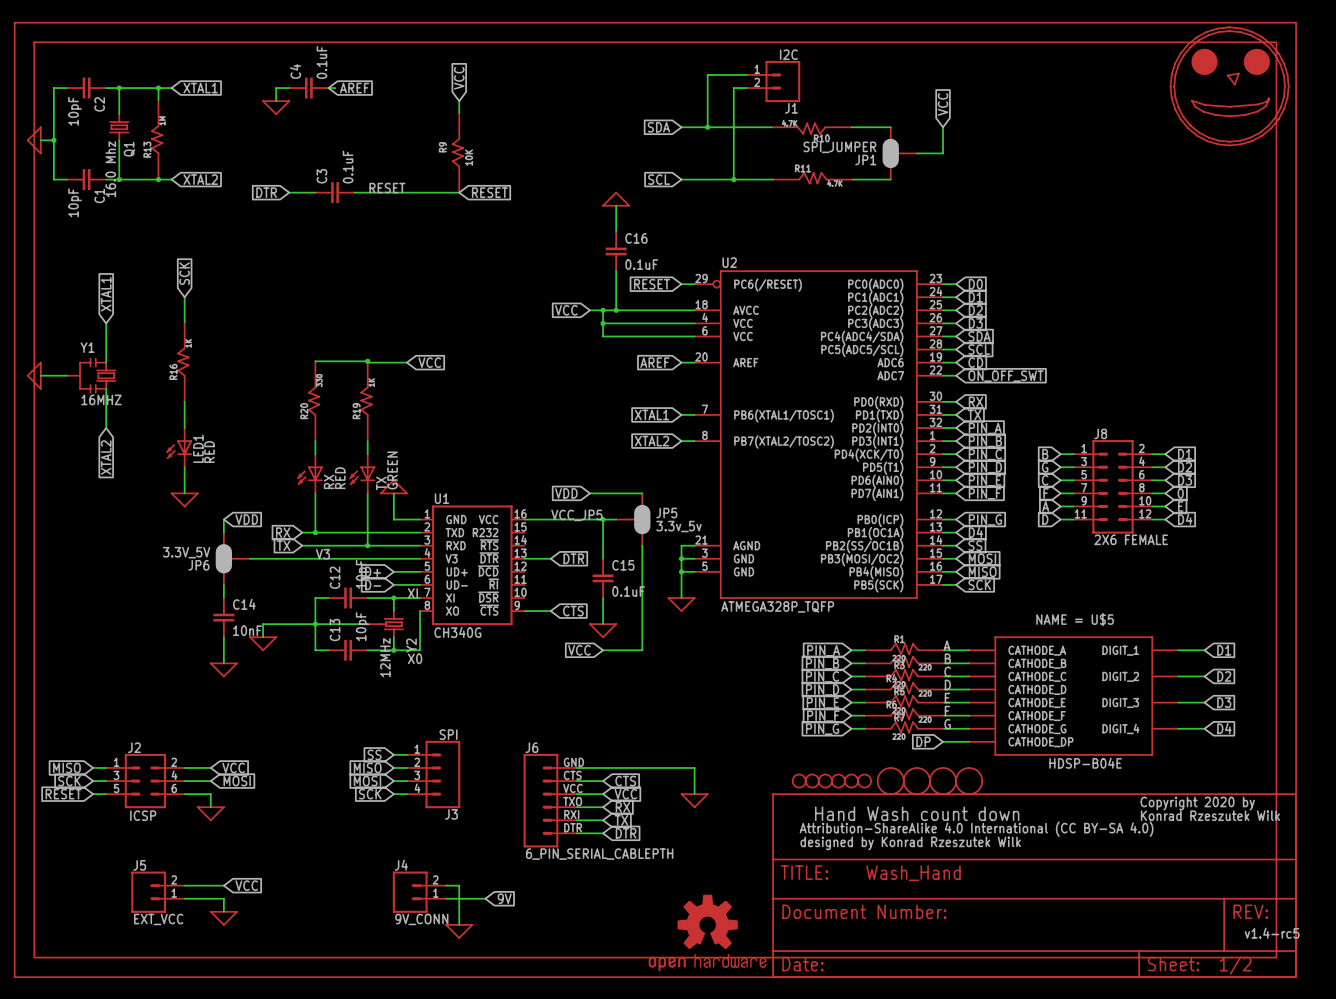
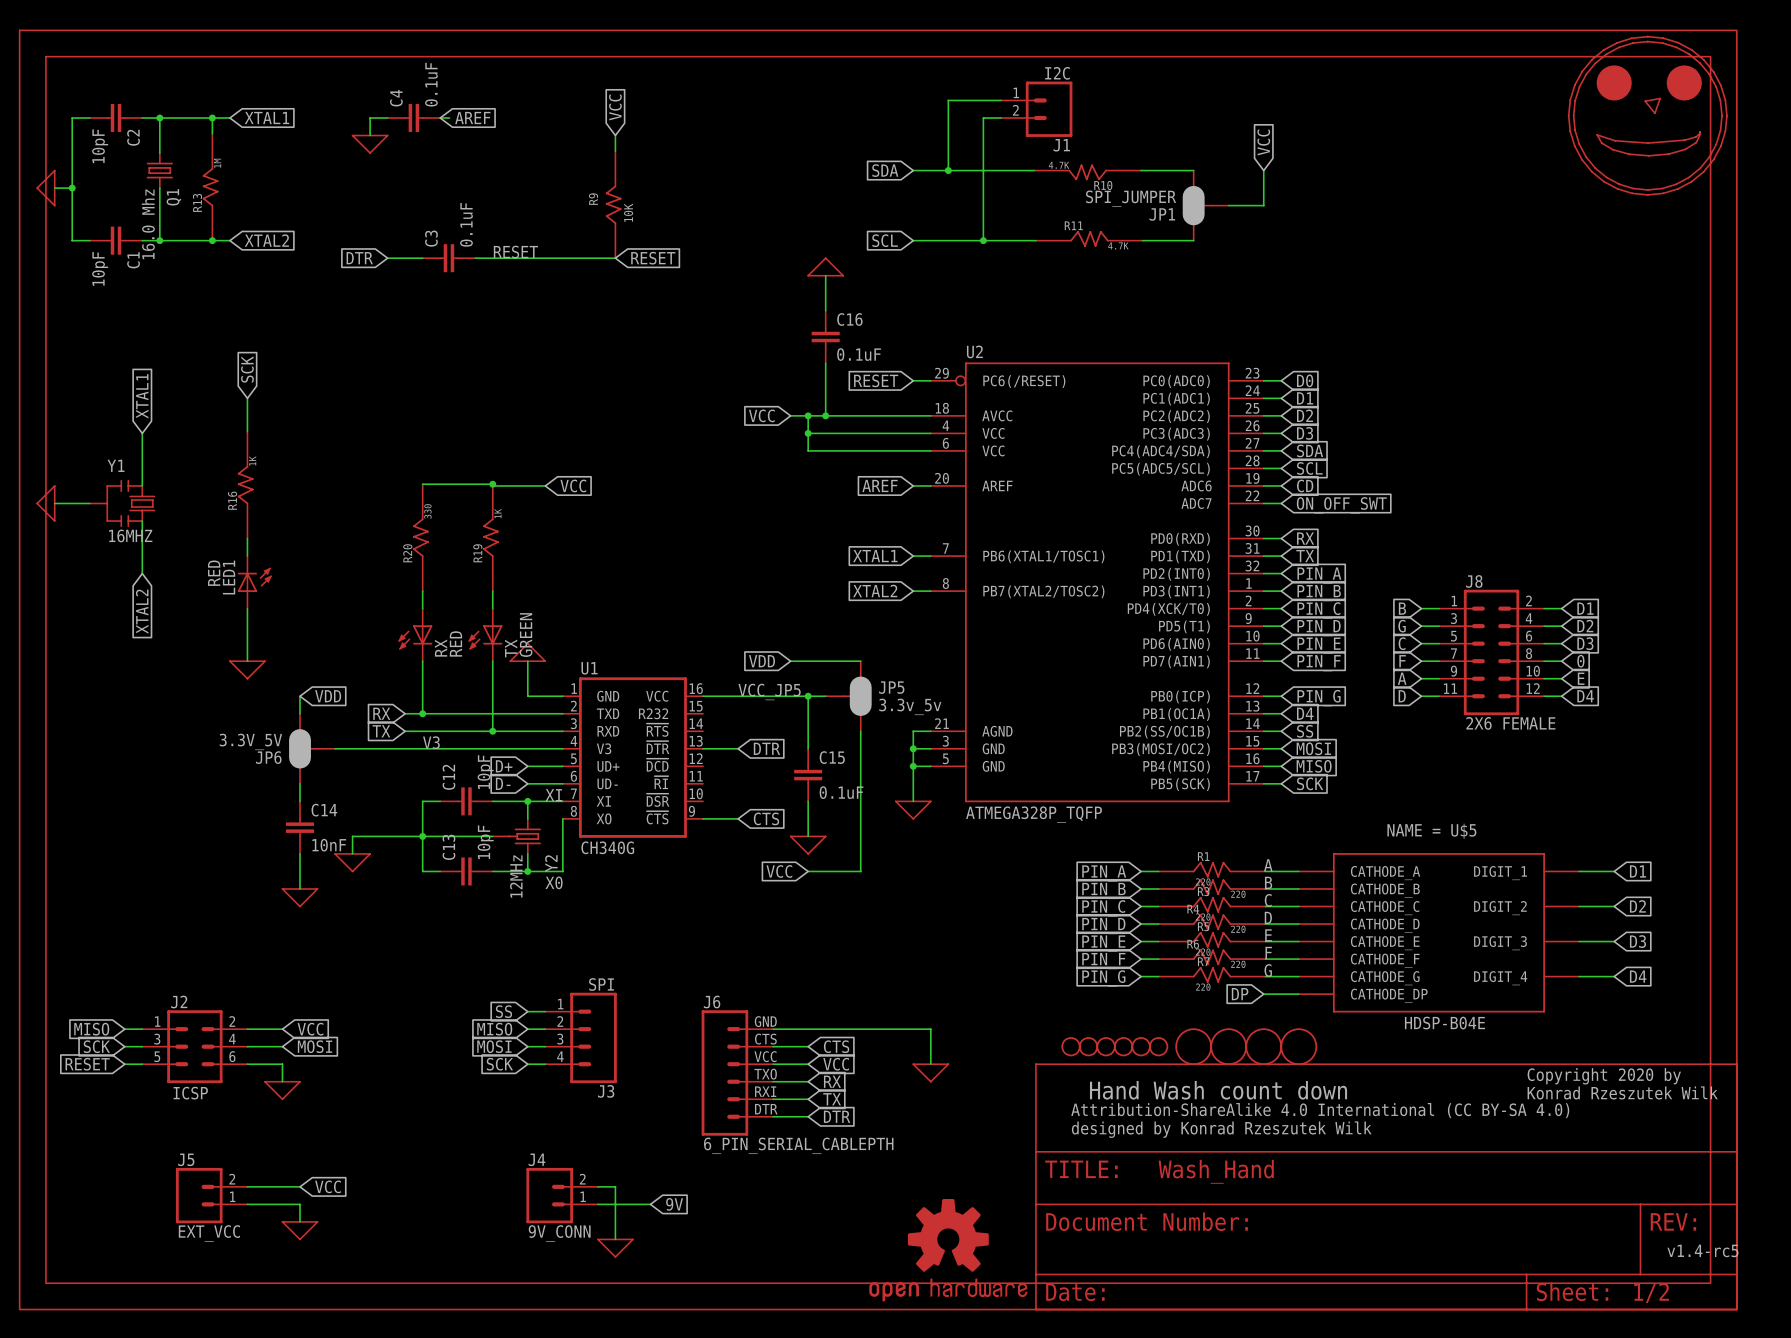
LED1 rotation: 0° (179, 449) -> 180° (254, 579)

